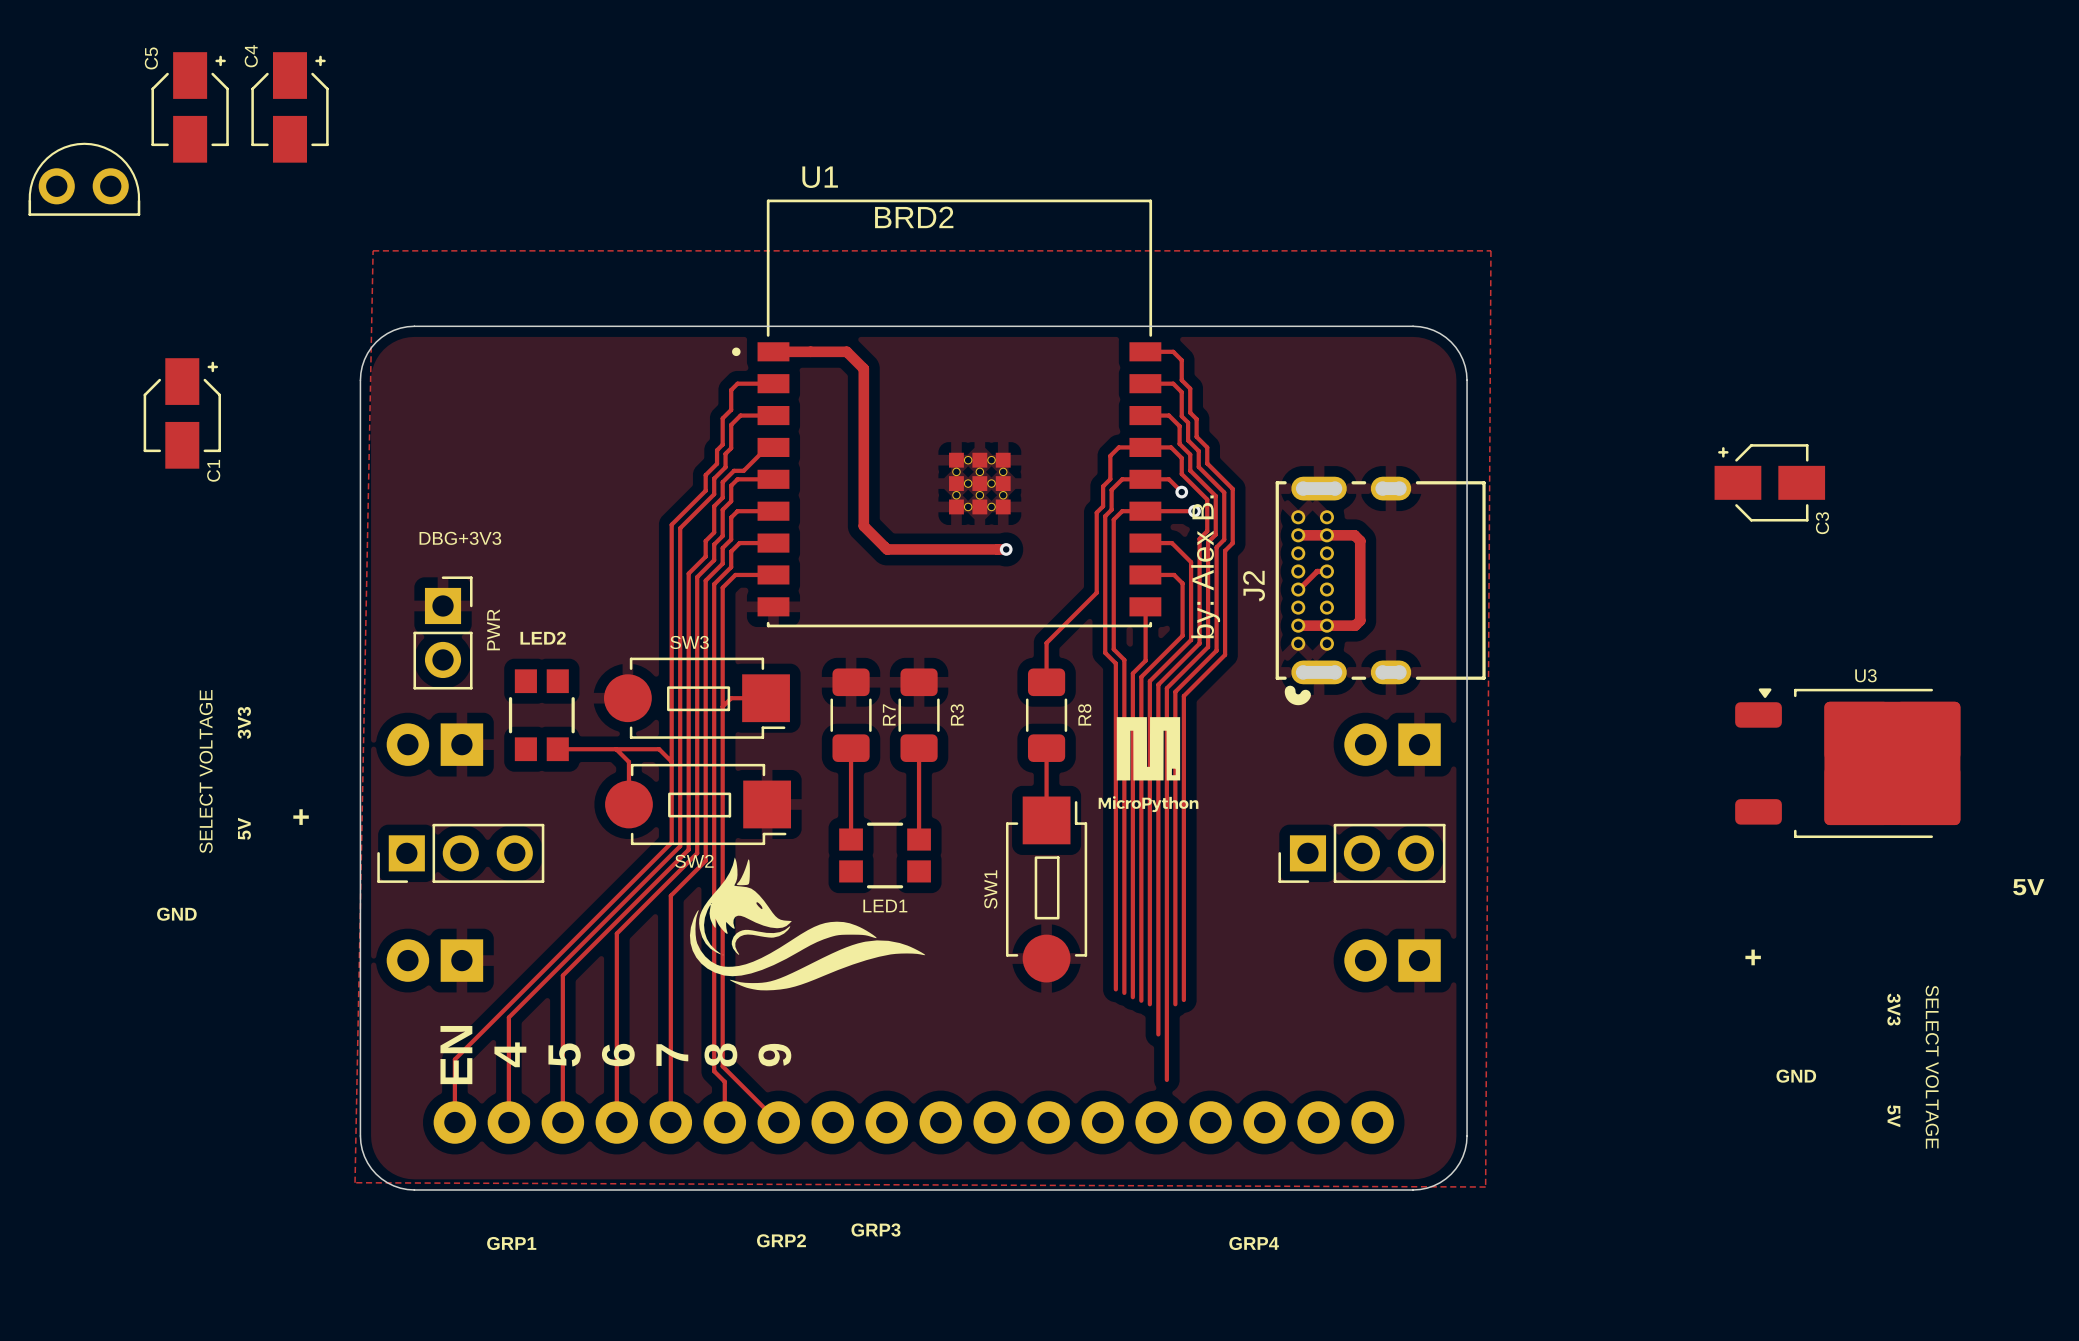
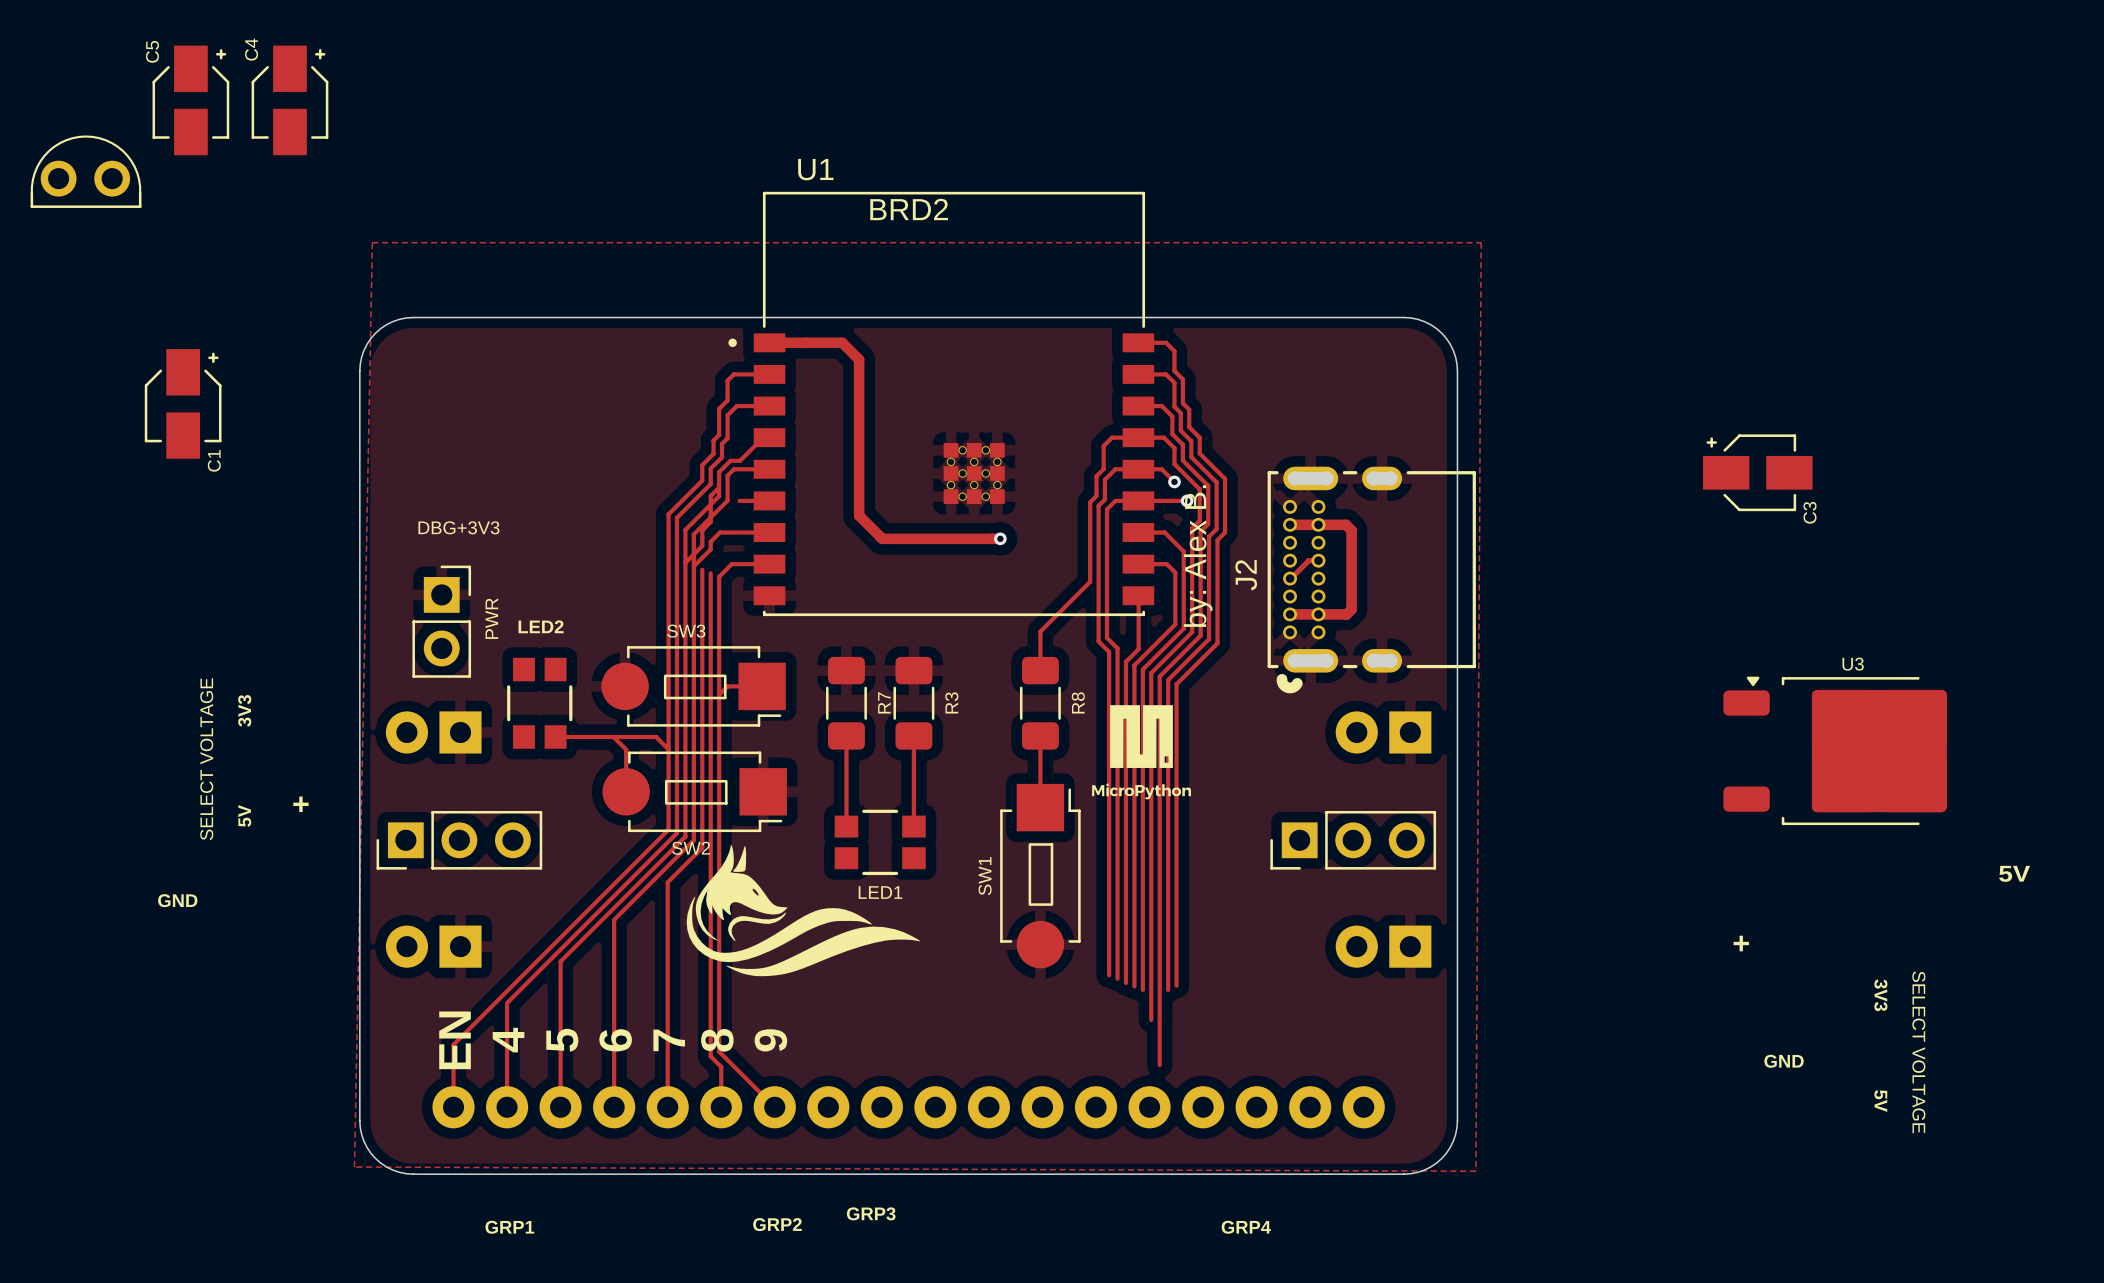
track: none -> (719, 487) (719, 496) (685, 529) (685, 562)
track: (731, 501) (722, 509) (722, 536) (714, 544) (714, 552) -> (727, 491) (727, 500) (693, 534) (693, 566)
track: (743, 511) (737, 511) (731, 517) (731, 539) (722, 548) (722, 563) (705, 580) -> none
track: (739, 543) (731, 551) (731, 567) (714, 584) -> (736, 532) (719, 532) (710, 541)

